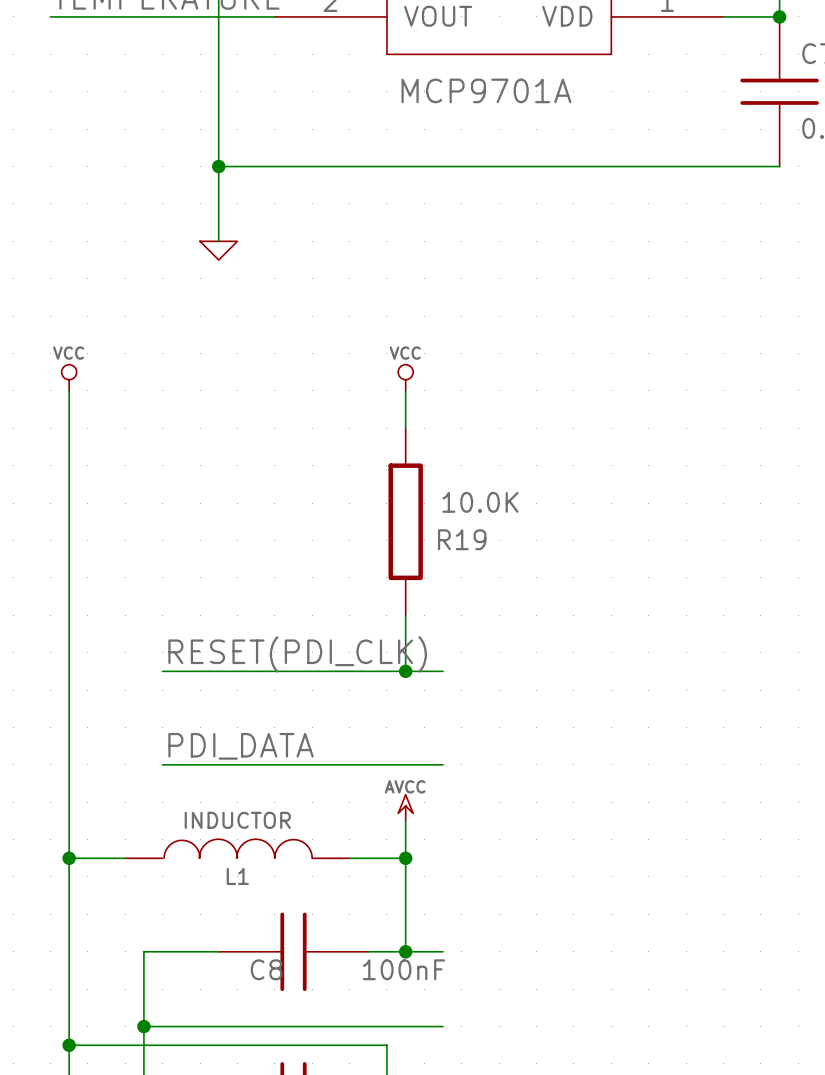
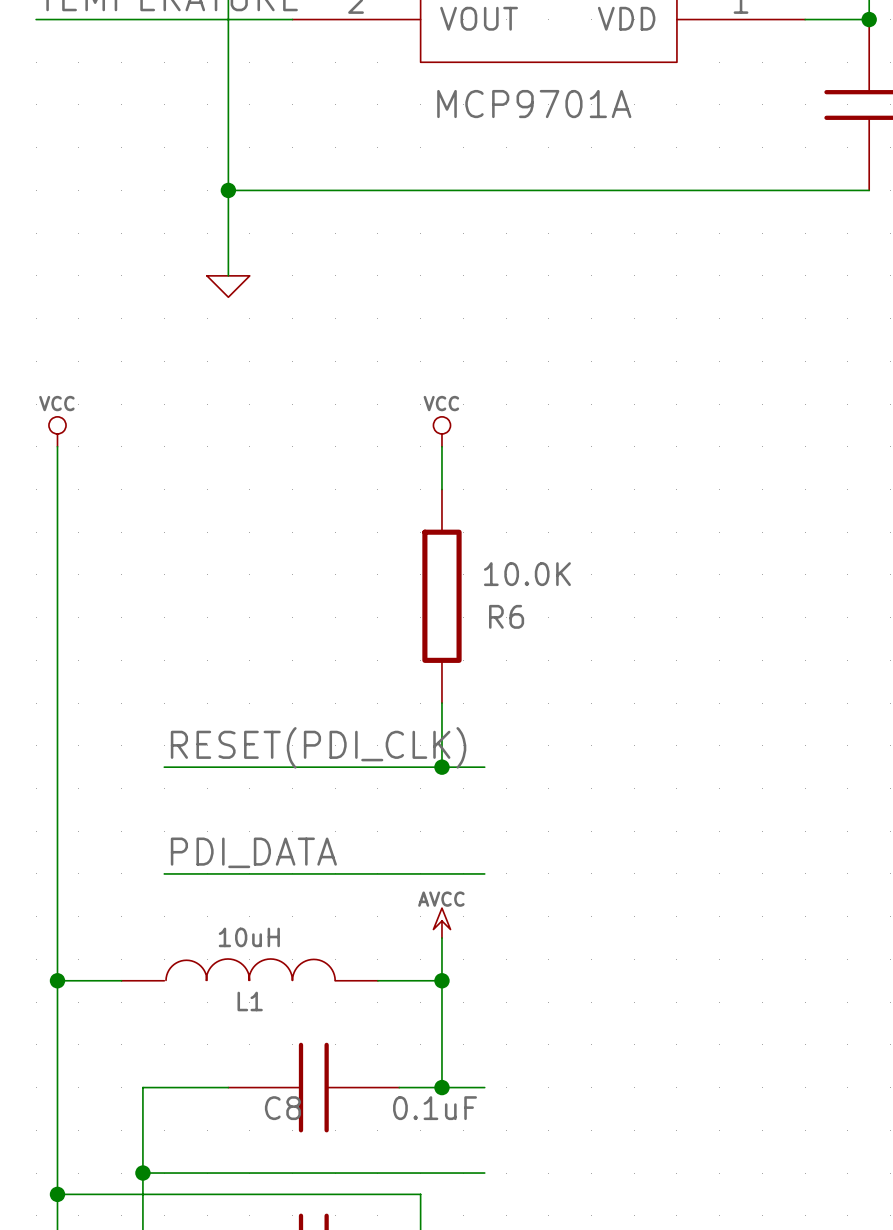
R19 name: R19 (462, 539) -> R6 (506, 616)
L1 value: INDUCTOR (237, 820) -> 10uH (249, 937)
C8 value: 100nF (404, 969) -> 0.1uF (435, 1108)

